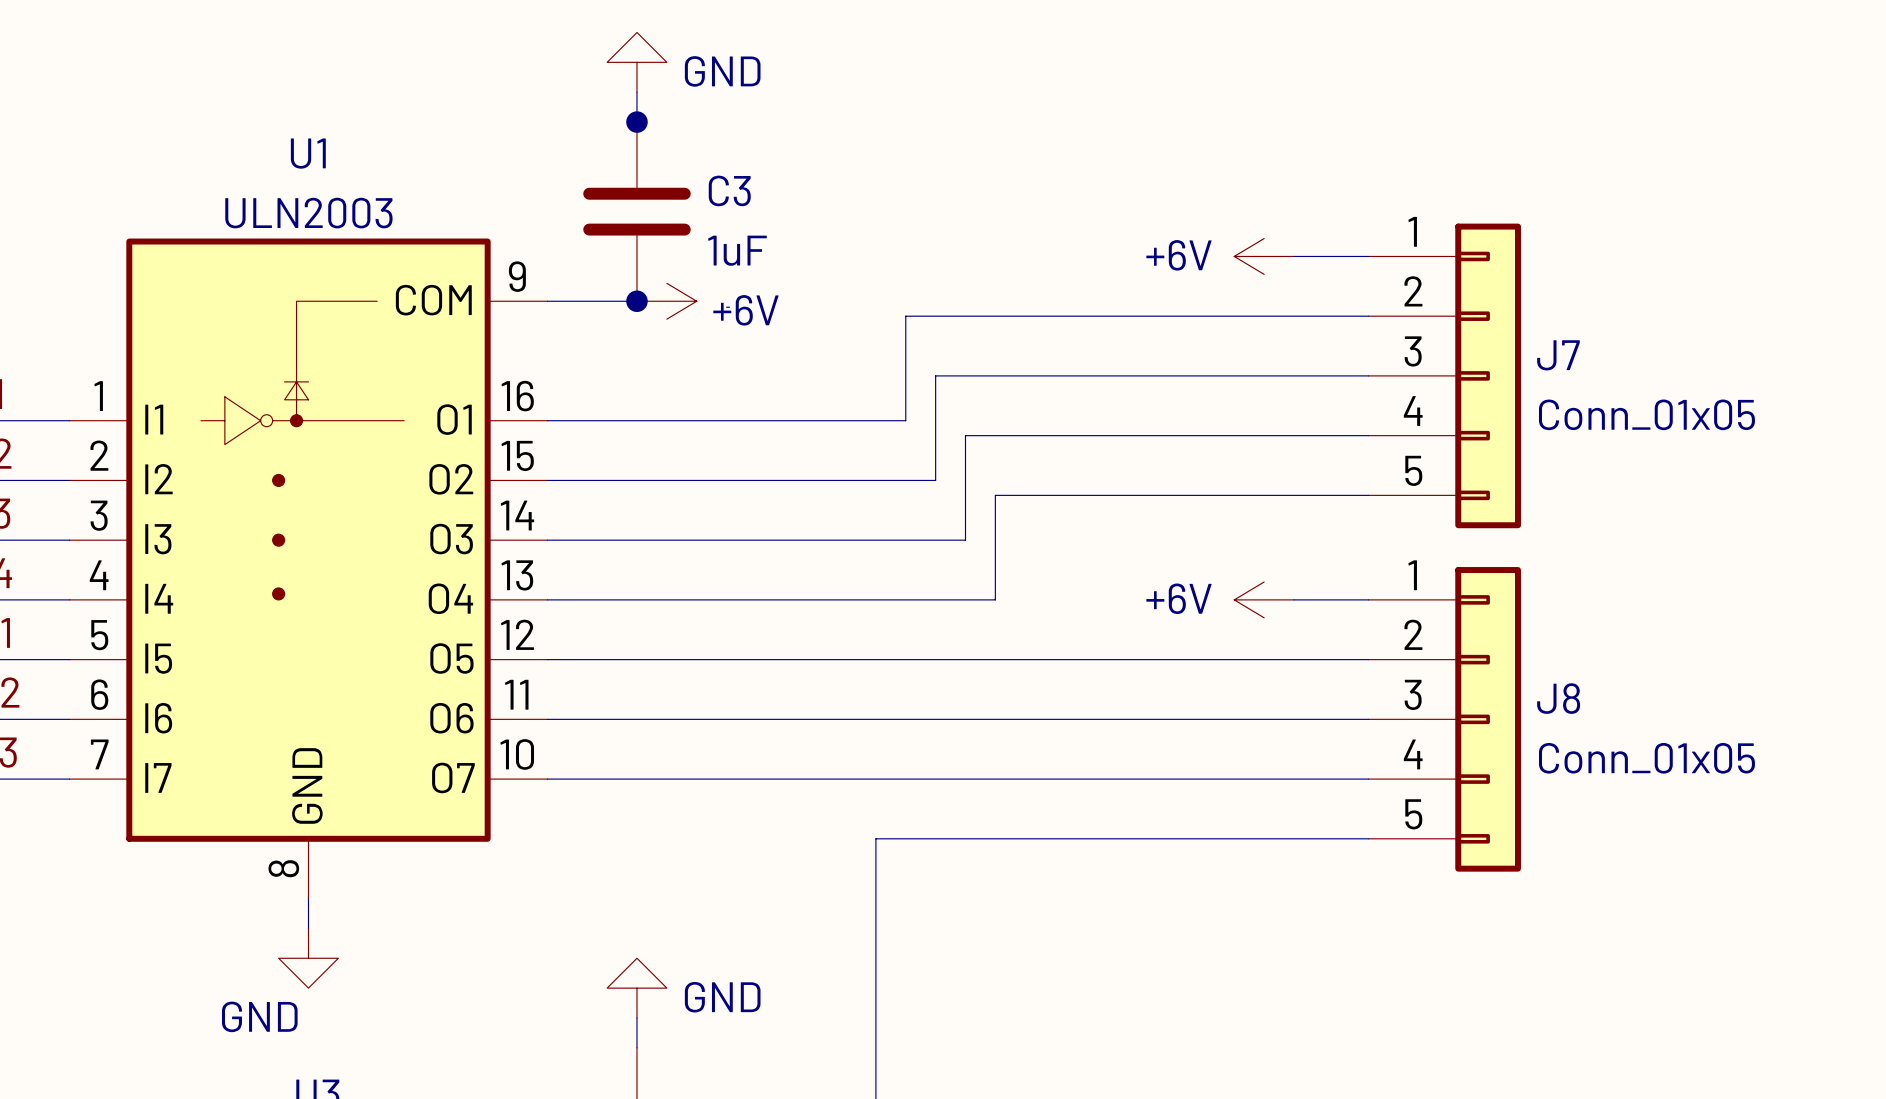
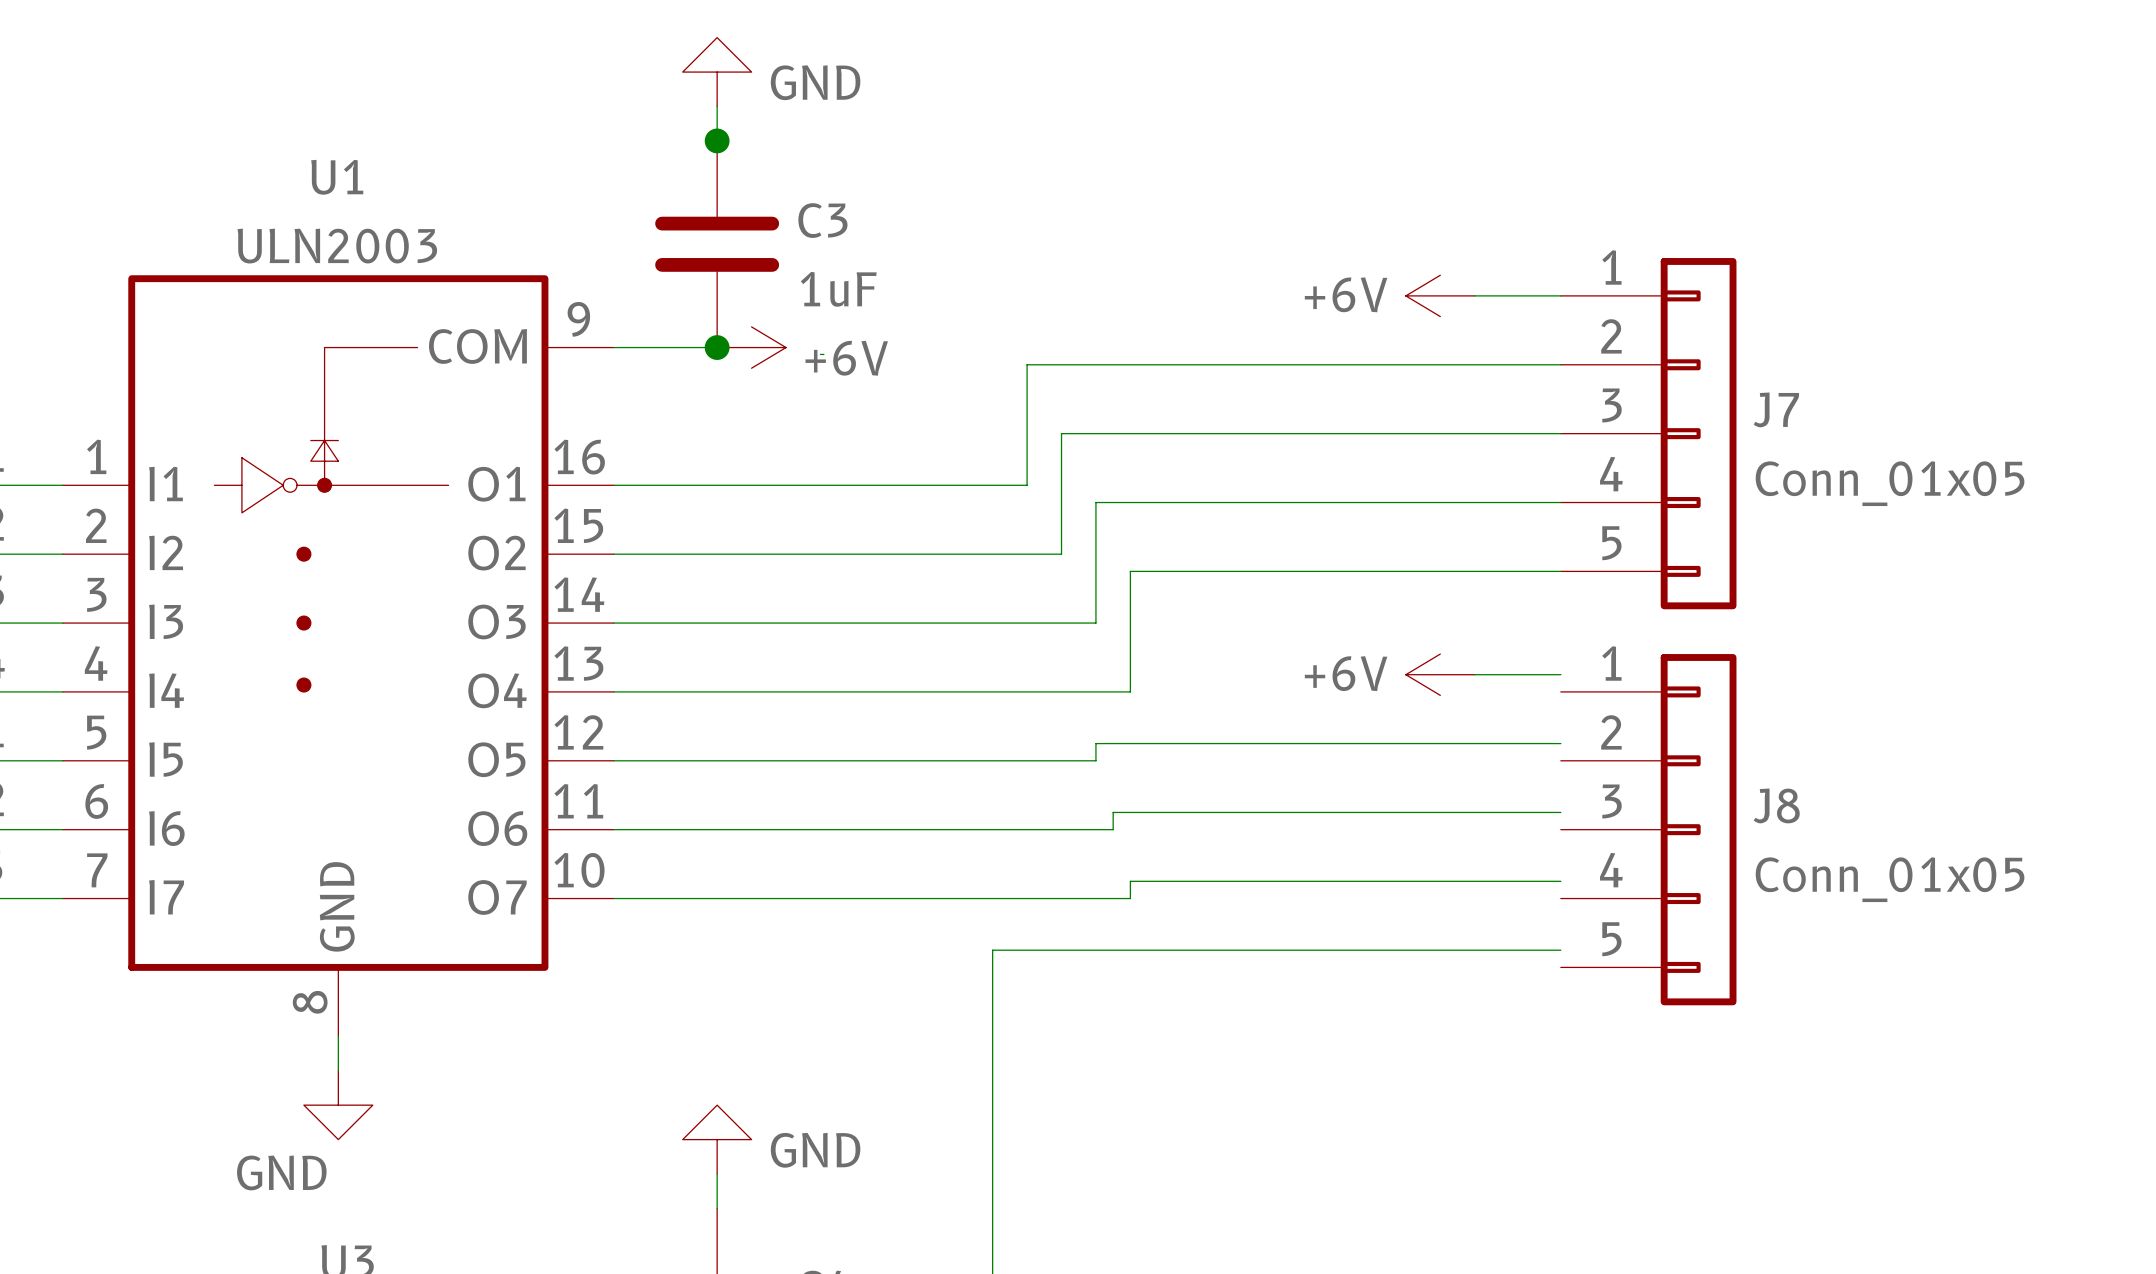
power symbol position: +6V (1264, 599) -> +6V (1440, 674)
wire: (1294, 599) (1368, 599) -> (1474, 674) (1560, 674)
wire: (965, 659) (1368, 659) -> (1095, 760) (1095, 743) (1560, 743)
wire: (980, 719) (1368, 719) -> (1113, 829) (1113, 812) (1560, 812)
wire: (995, 779) (1368, 779) -> (1130, 898) (1130, 881) (1560, 881)
wire: (875, 838) (1368, 838) -> (992, 967) (992, 950) (1560, 950)

